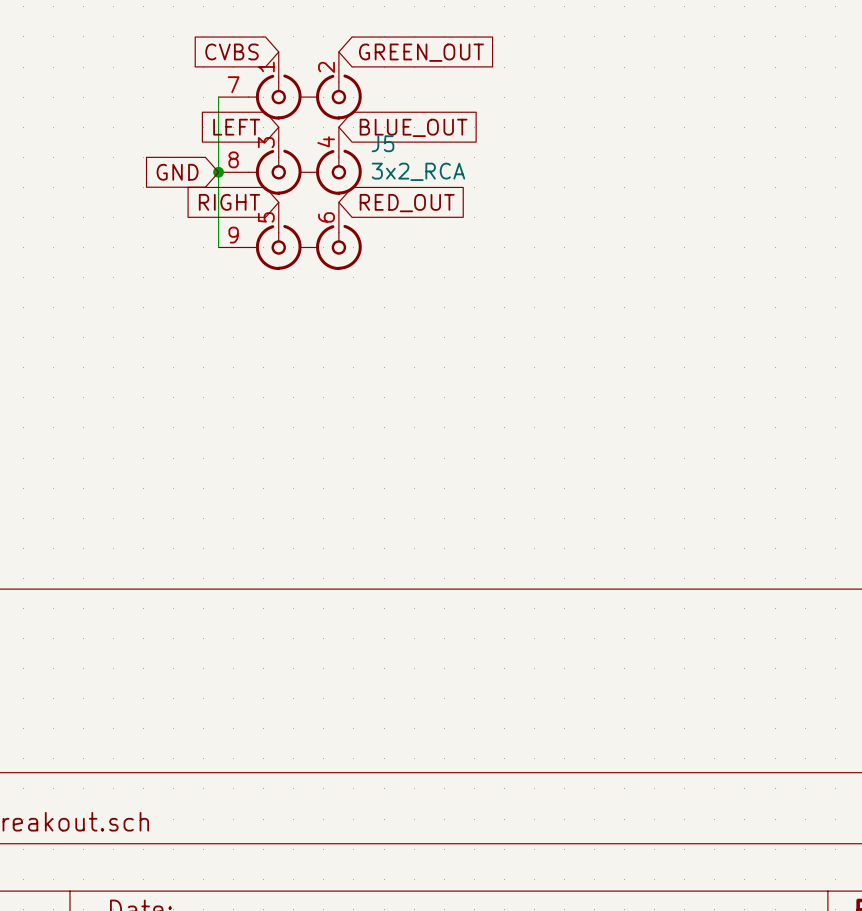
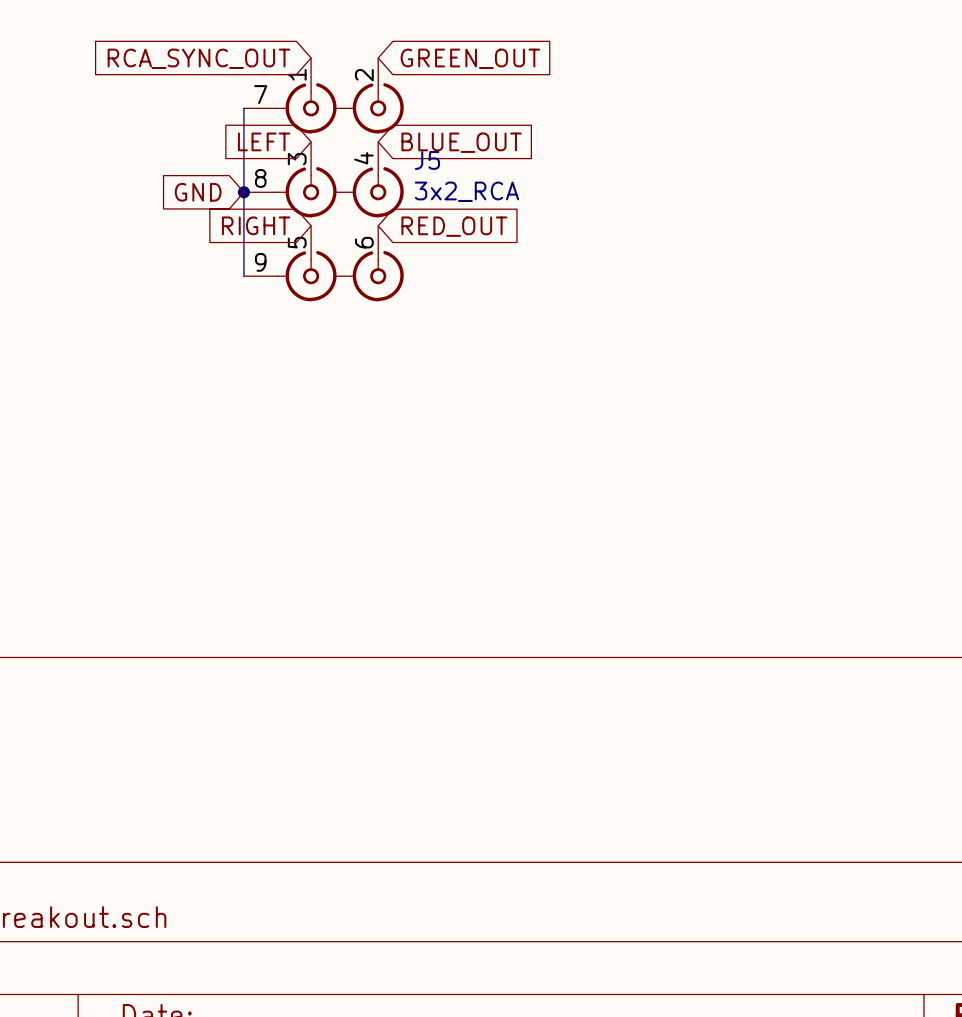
global label: CVBS (231, 51) -> RCA_SYNC_OUT (198, 58)

